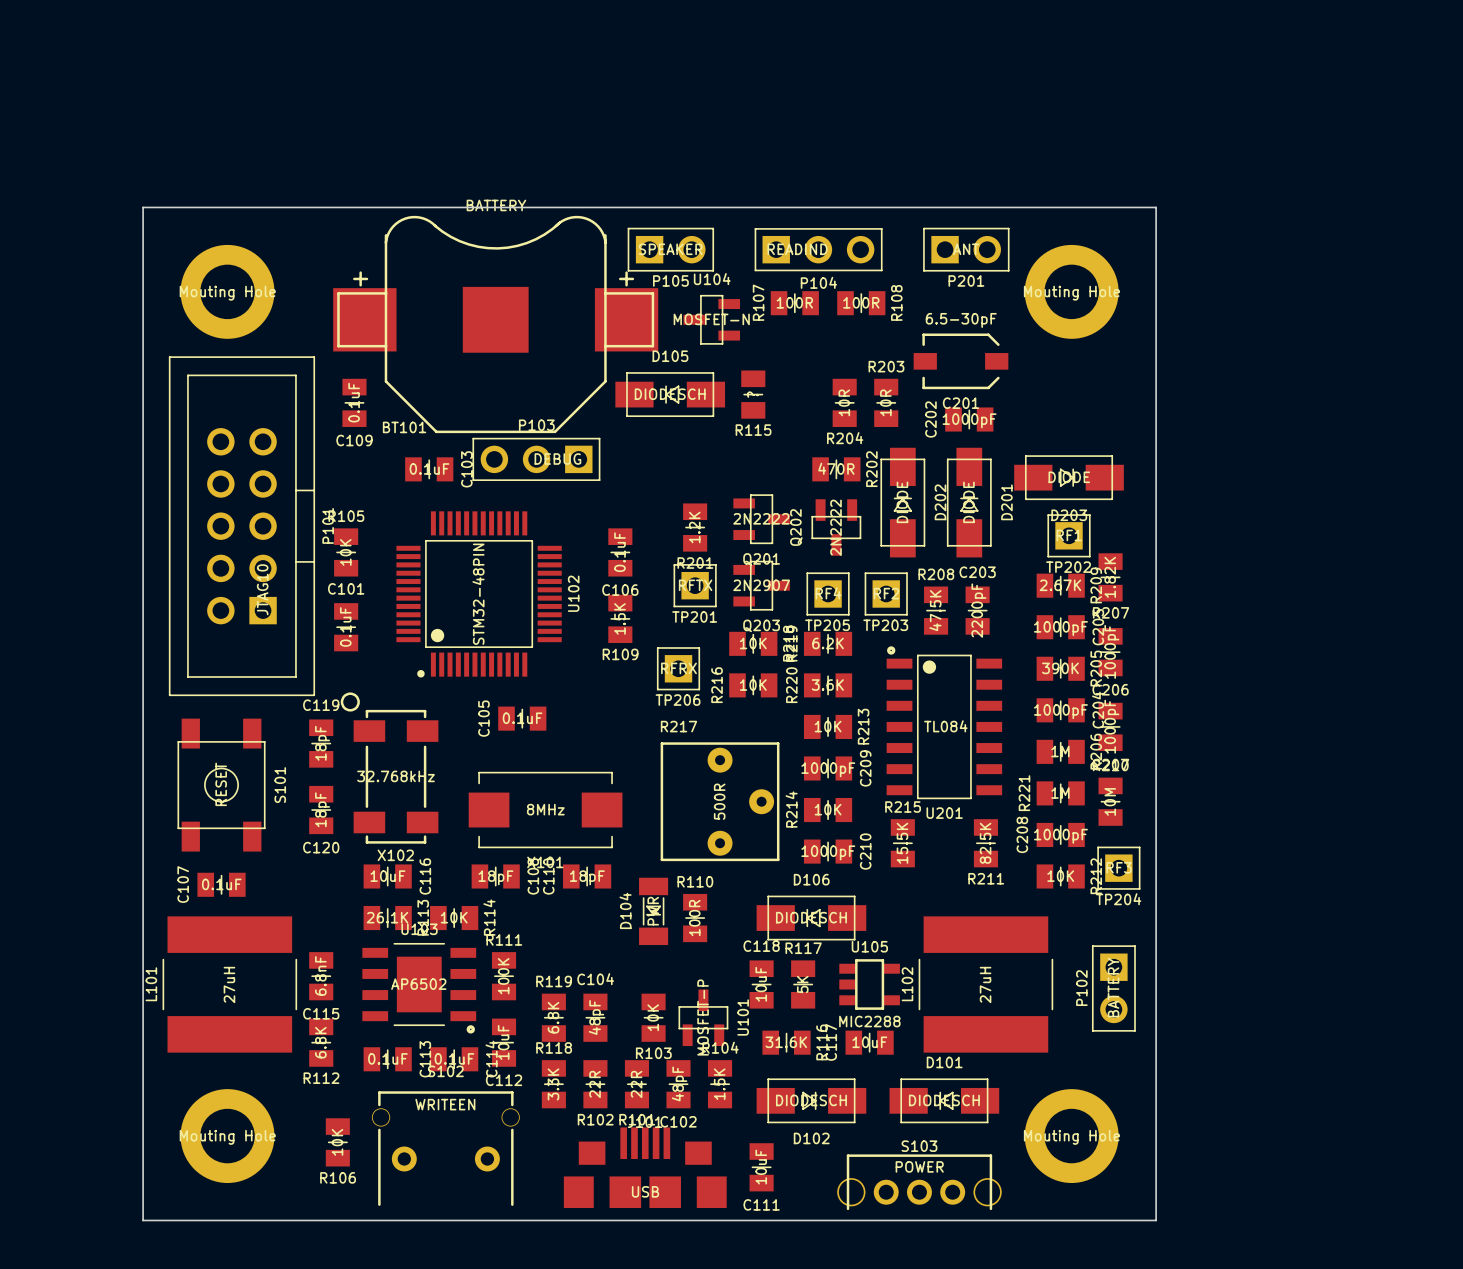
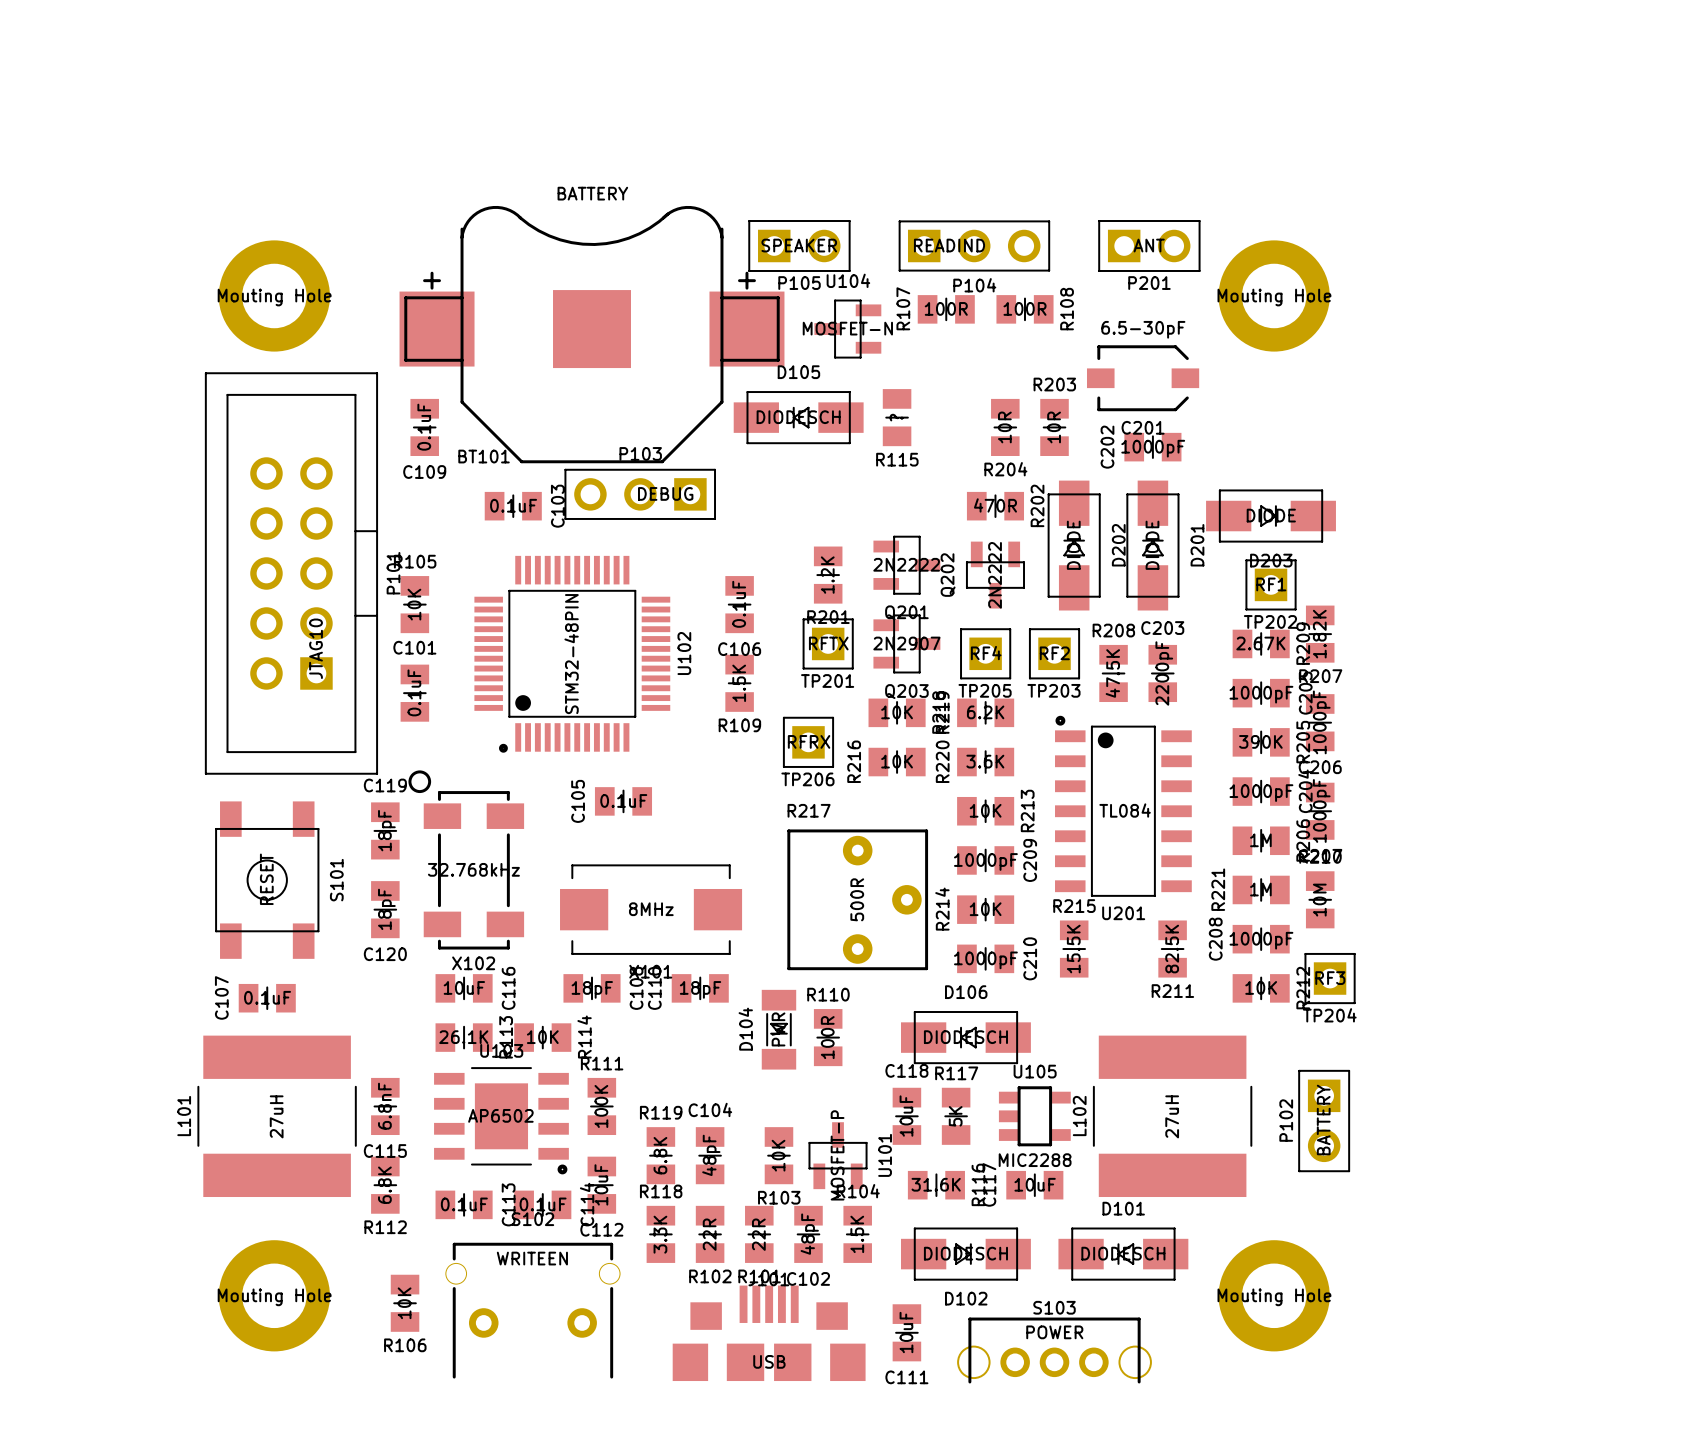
board edge: (143, 207) (143, 1220) (1156, 1220) (1156, 207) (143, 207) -> none
S103 position: (919, 1182) -> (1054, 1350)

